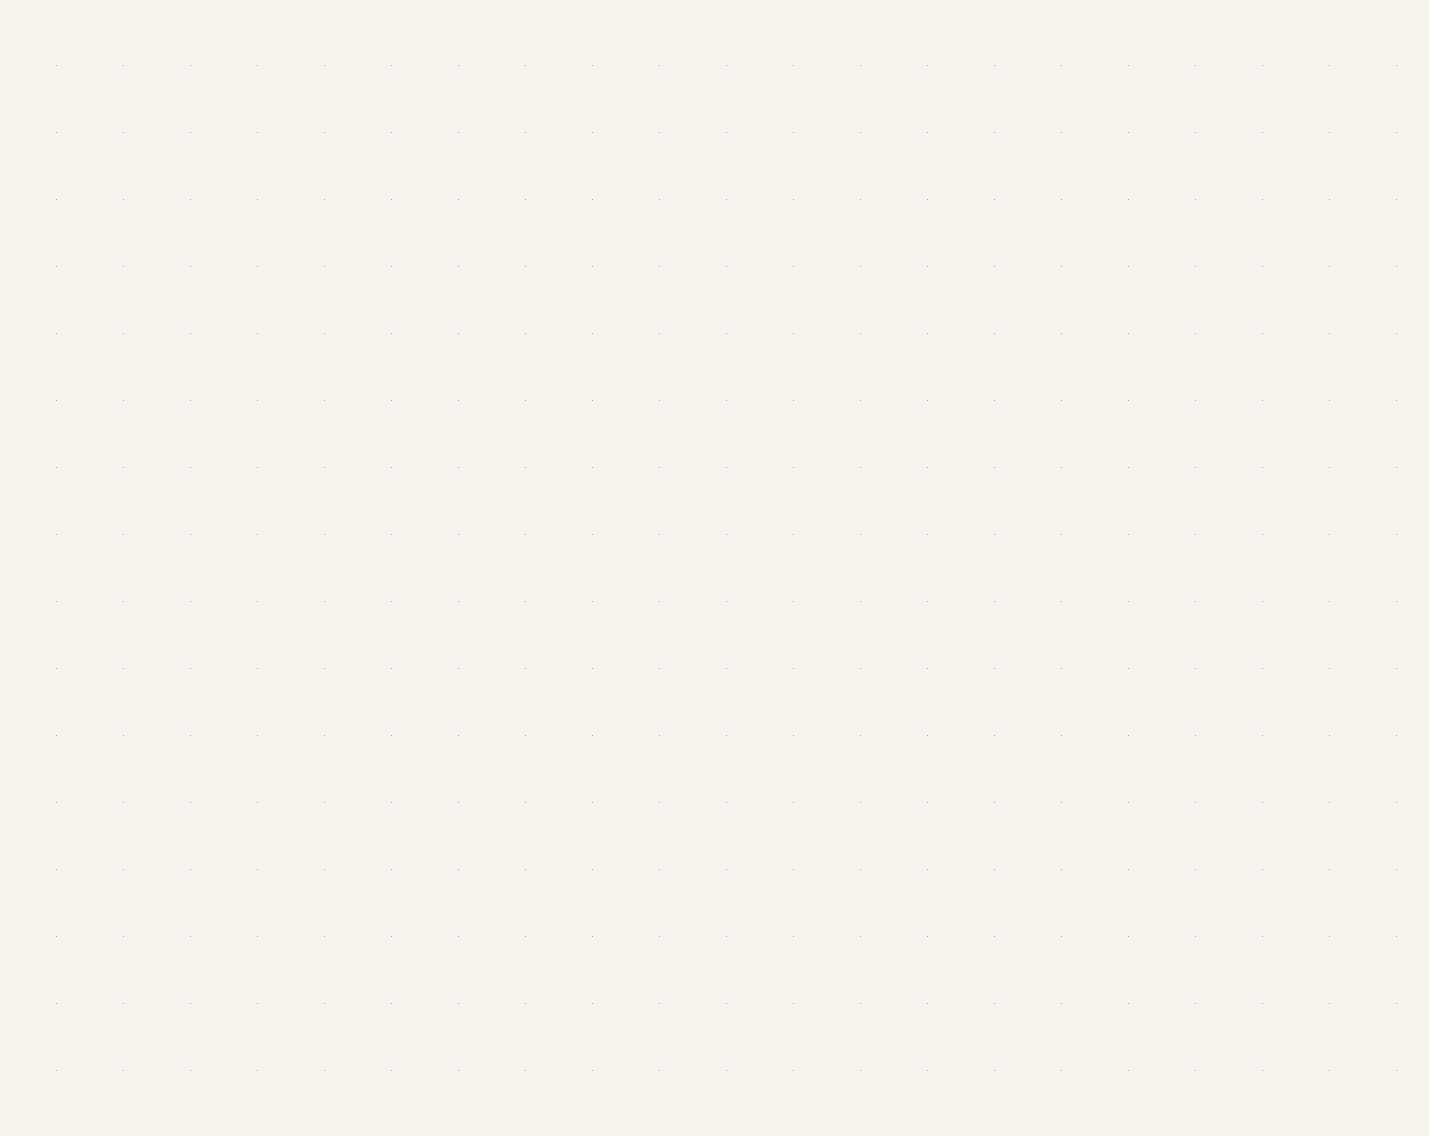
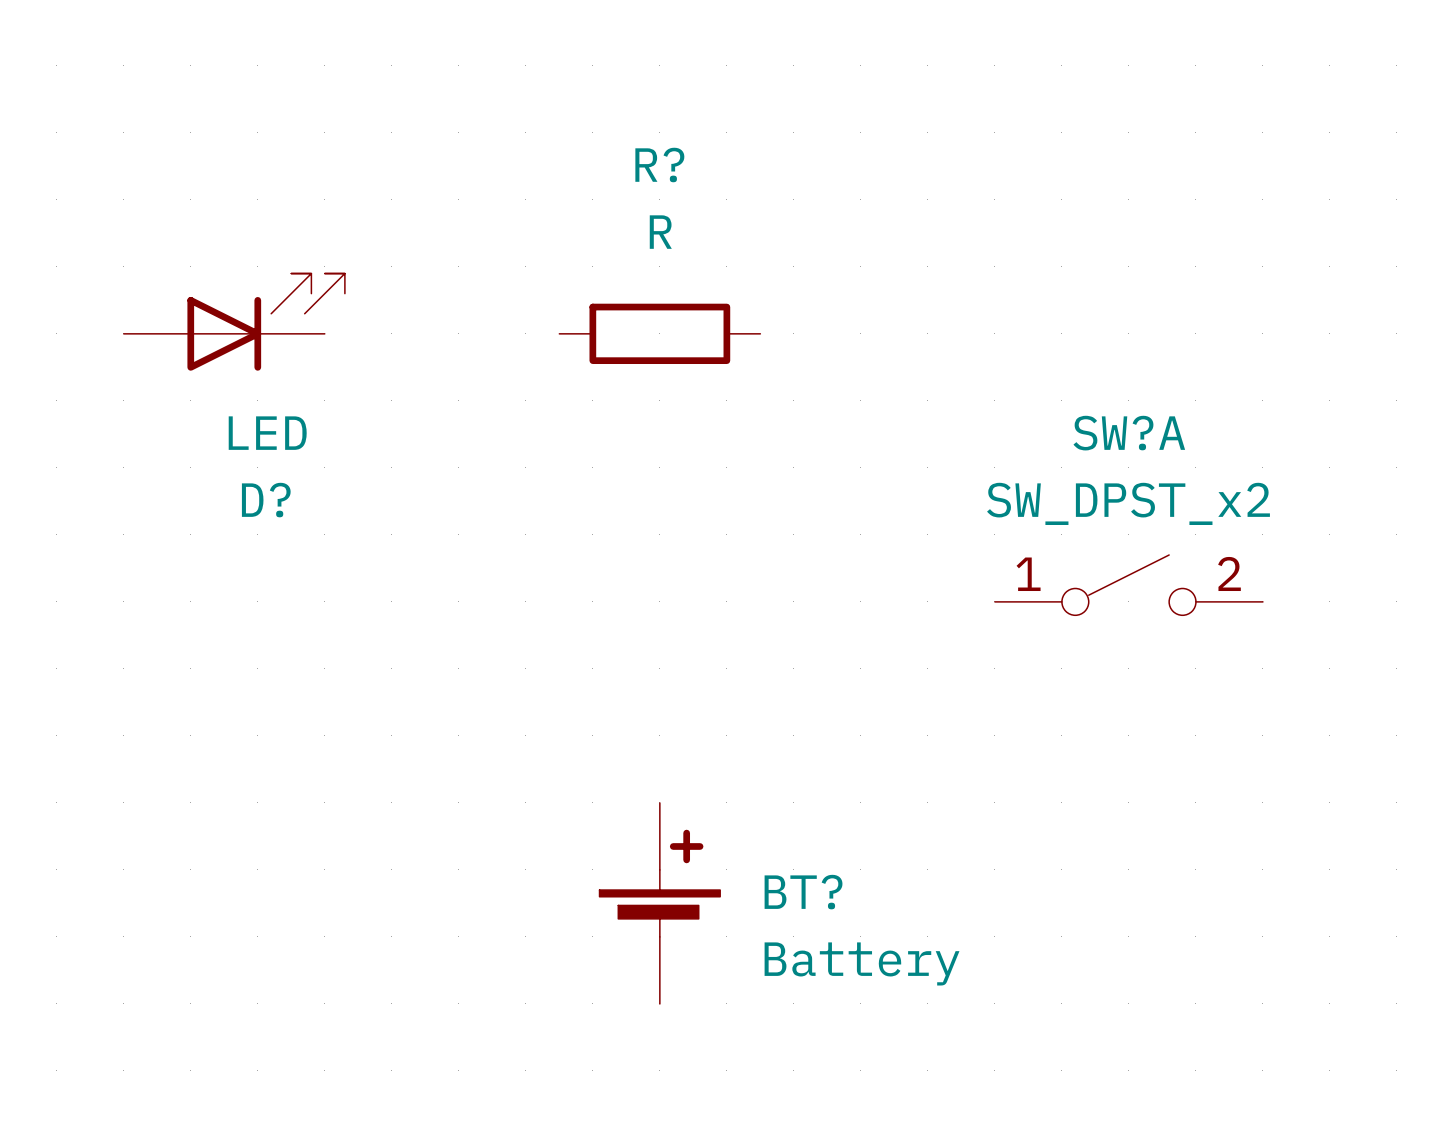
D?: none -> LED (234, 322)
R?: none -> R (659, 333)
SW?A: none -> SW_DPST_x2 (1128, 585)
BT?: none -> Battery (659, 903)

